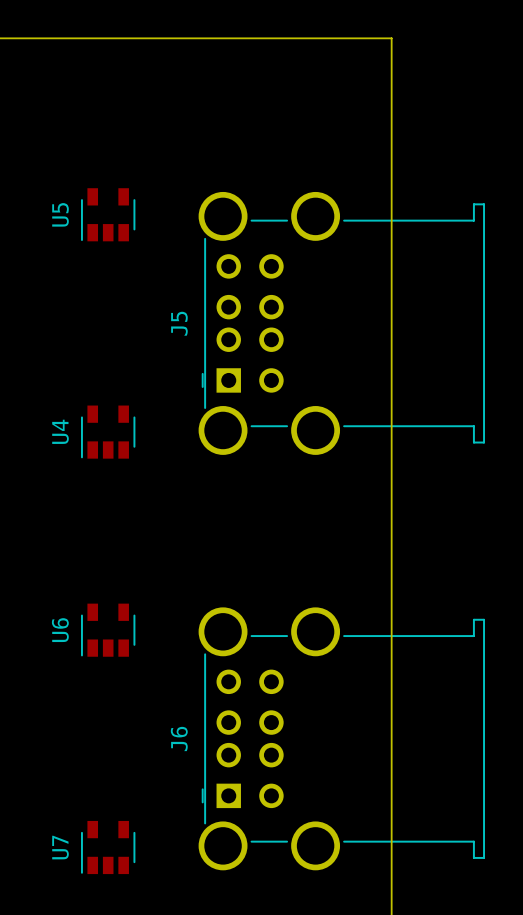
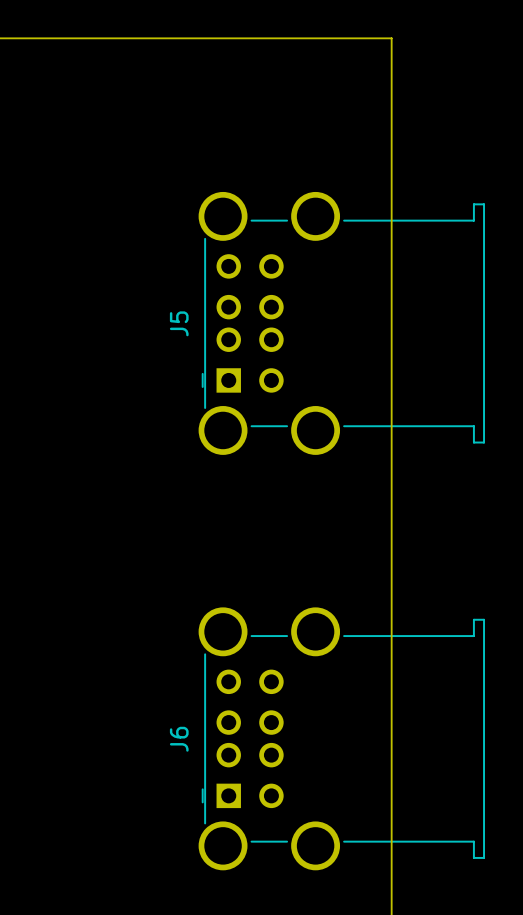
U5: (108, 214) -> none
U4: (108, 432) -> none
U6: (108, 630) -> none
U7: (108, 847) -> none

